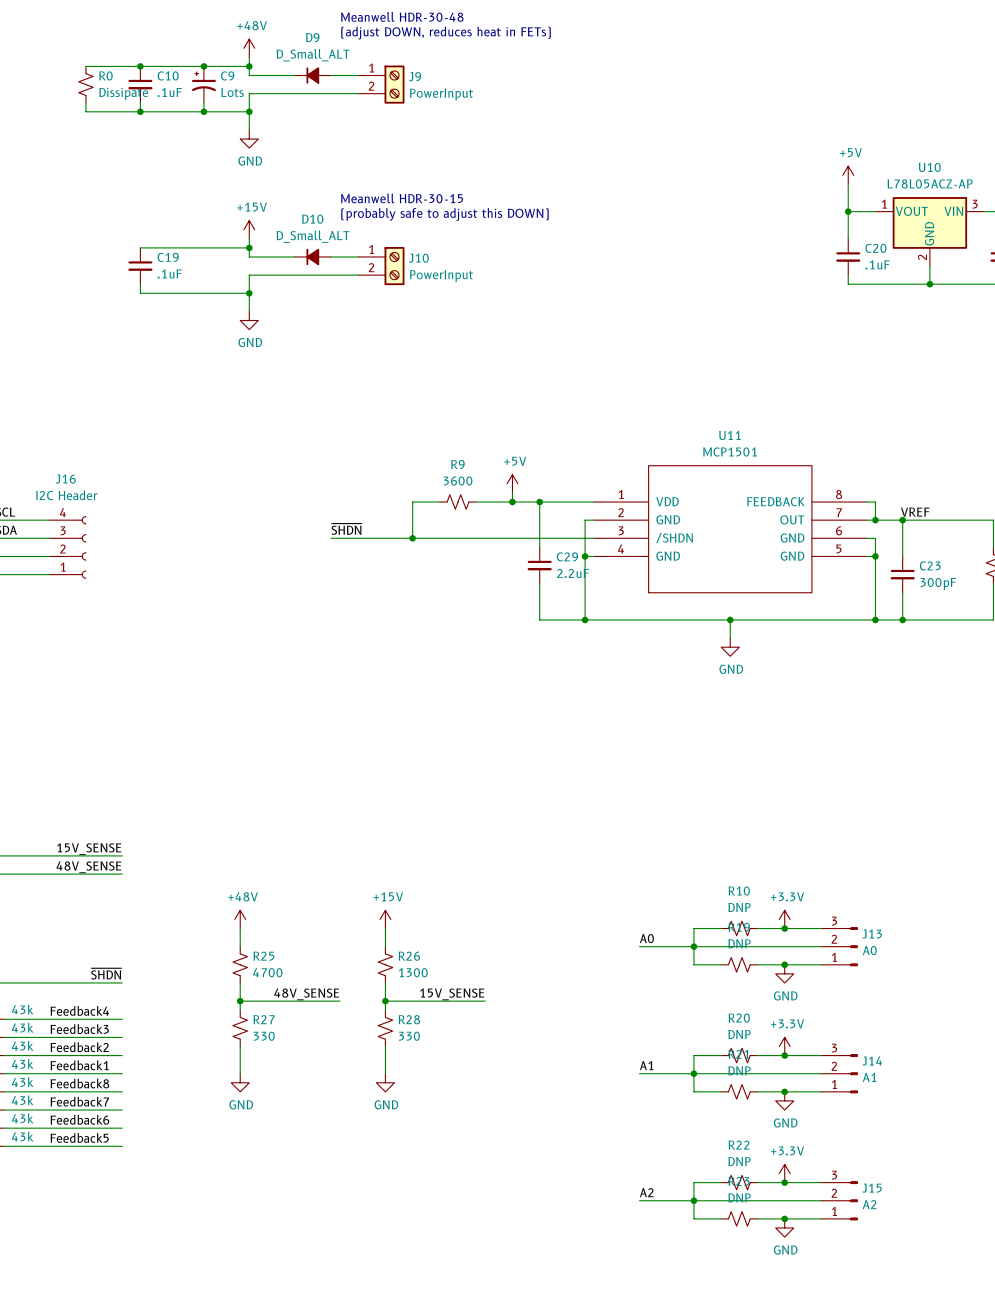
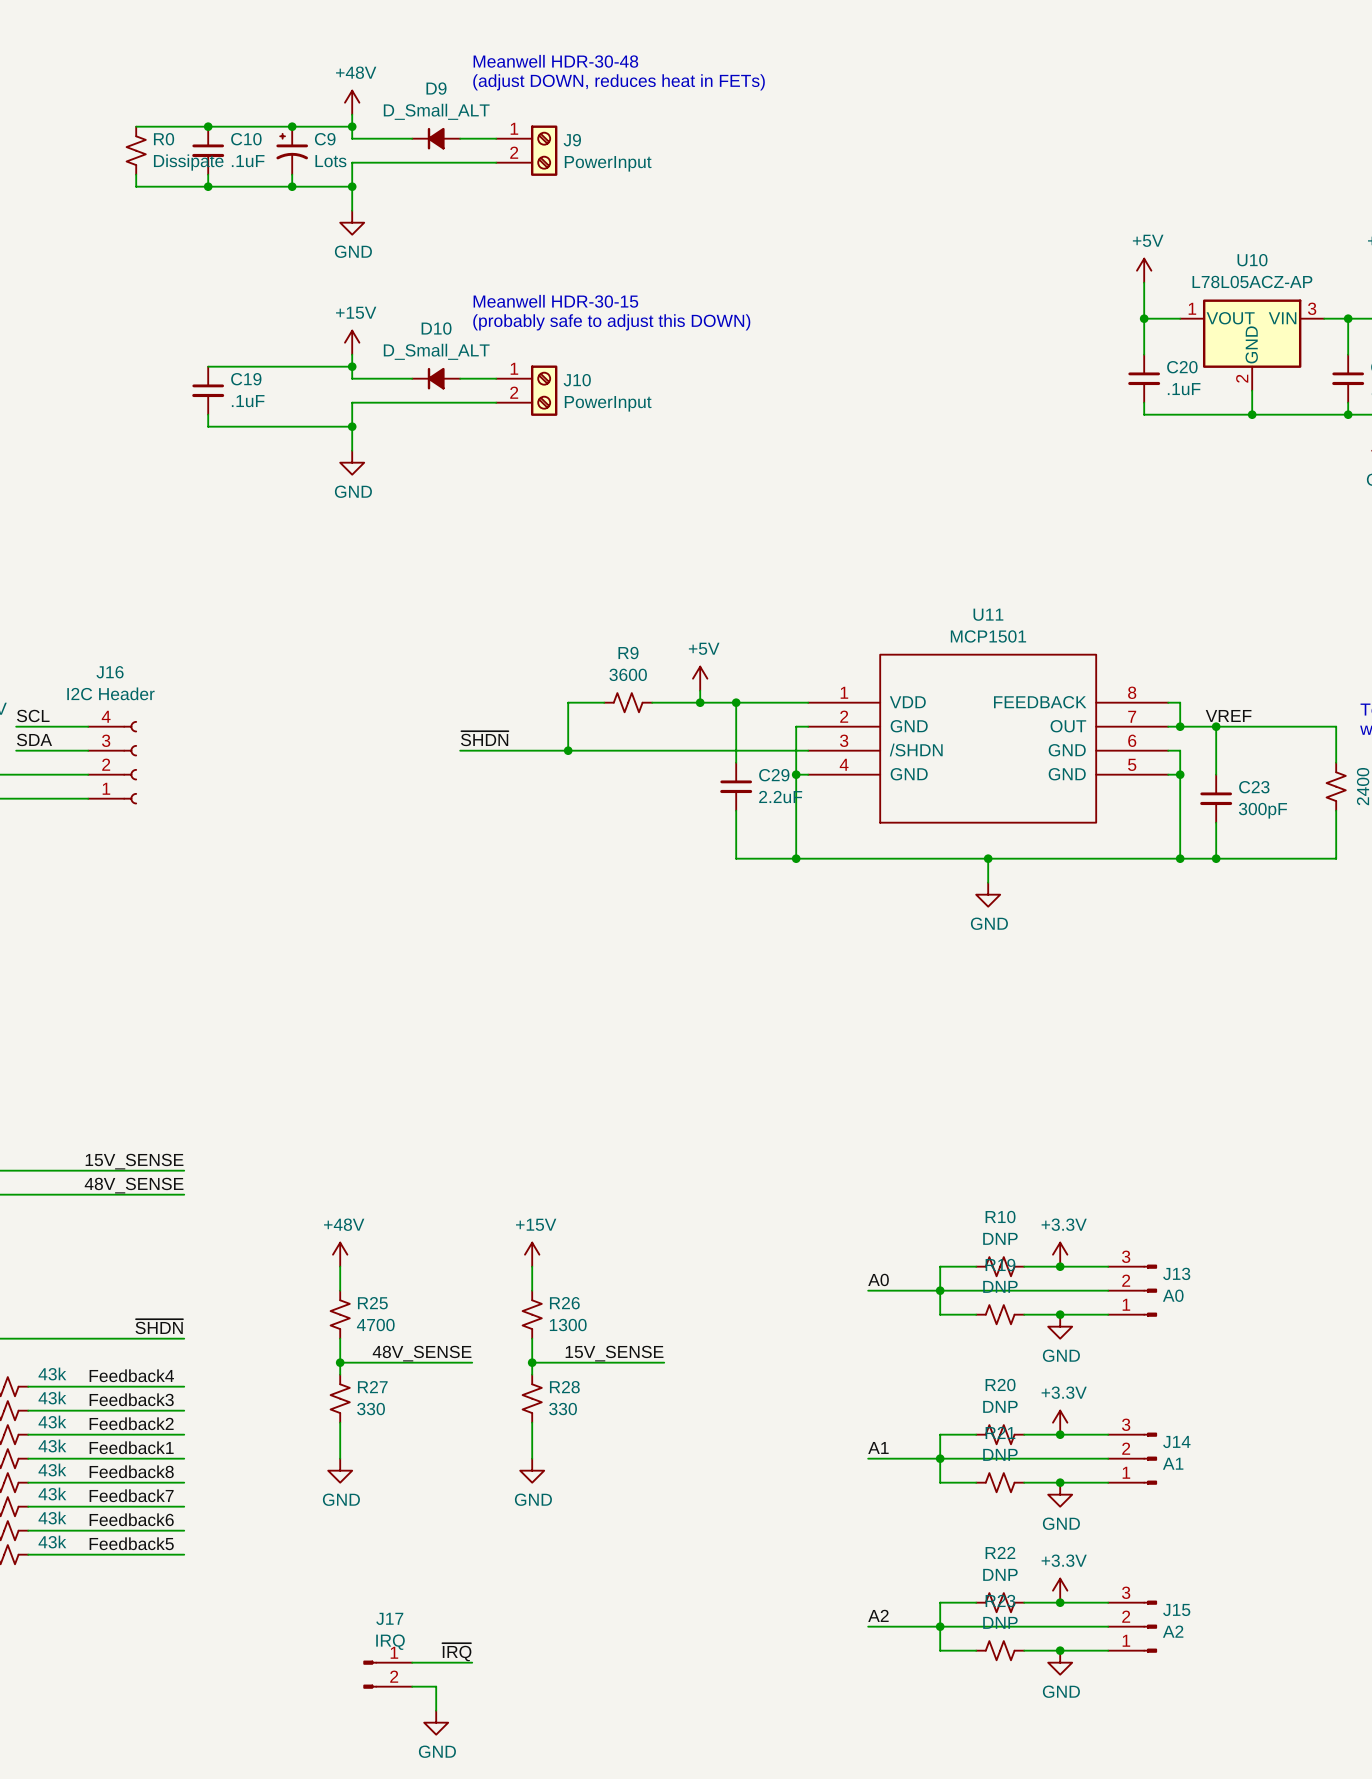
label: none -> ~{IRQ} (456, 1652)
wire: none -> (412, 1662) (472, 1662)
J17: none -> IRQ (387, 1674)
wire: none -> (412, 1686) (436, 1686) (436, 1710)
power symbol: none -> GND (436, 1722)

